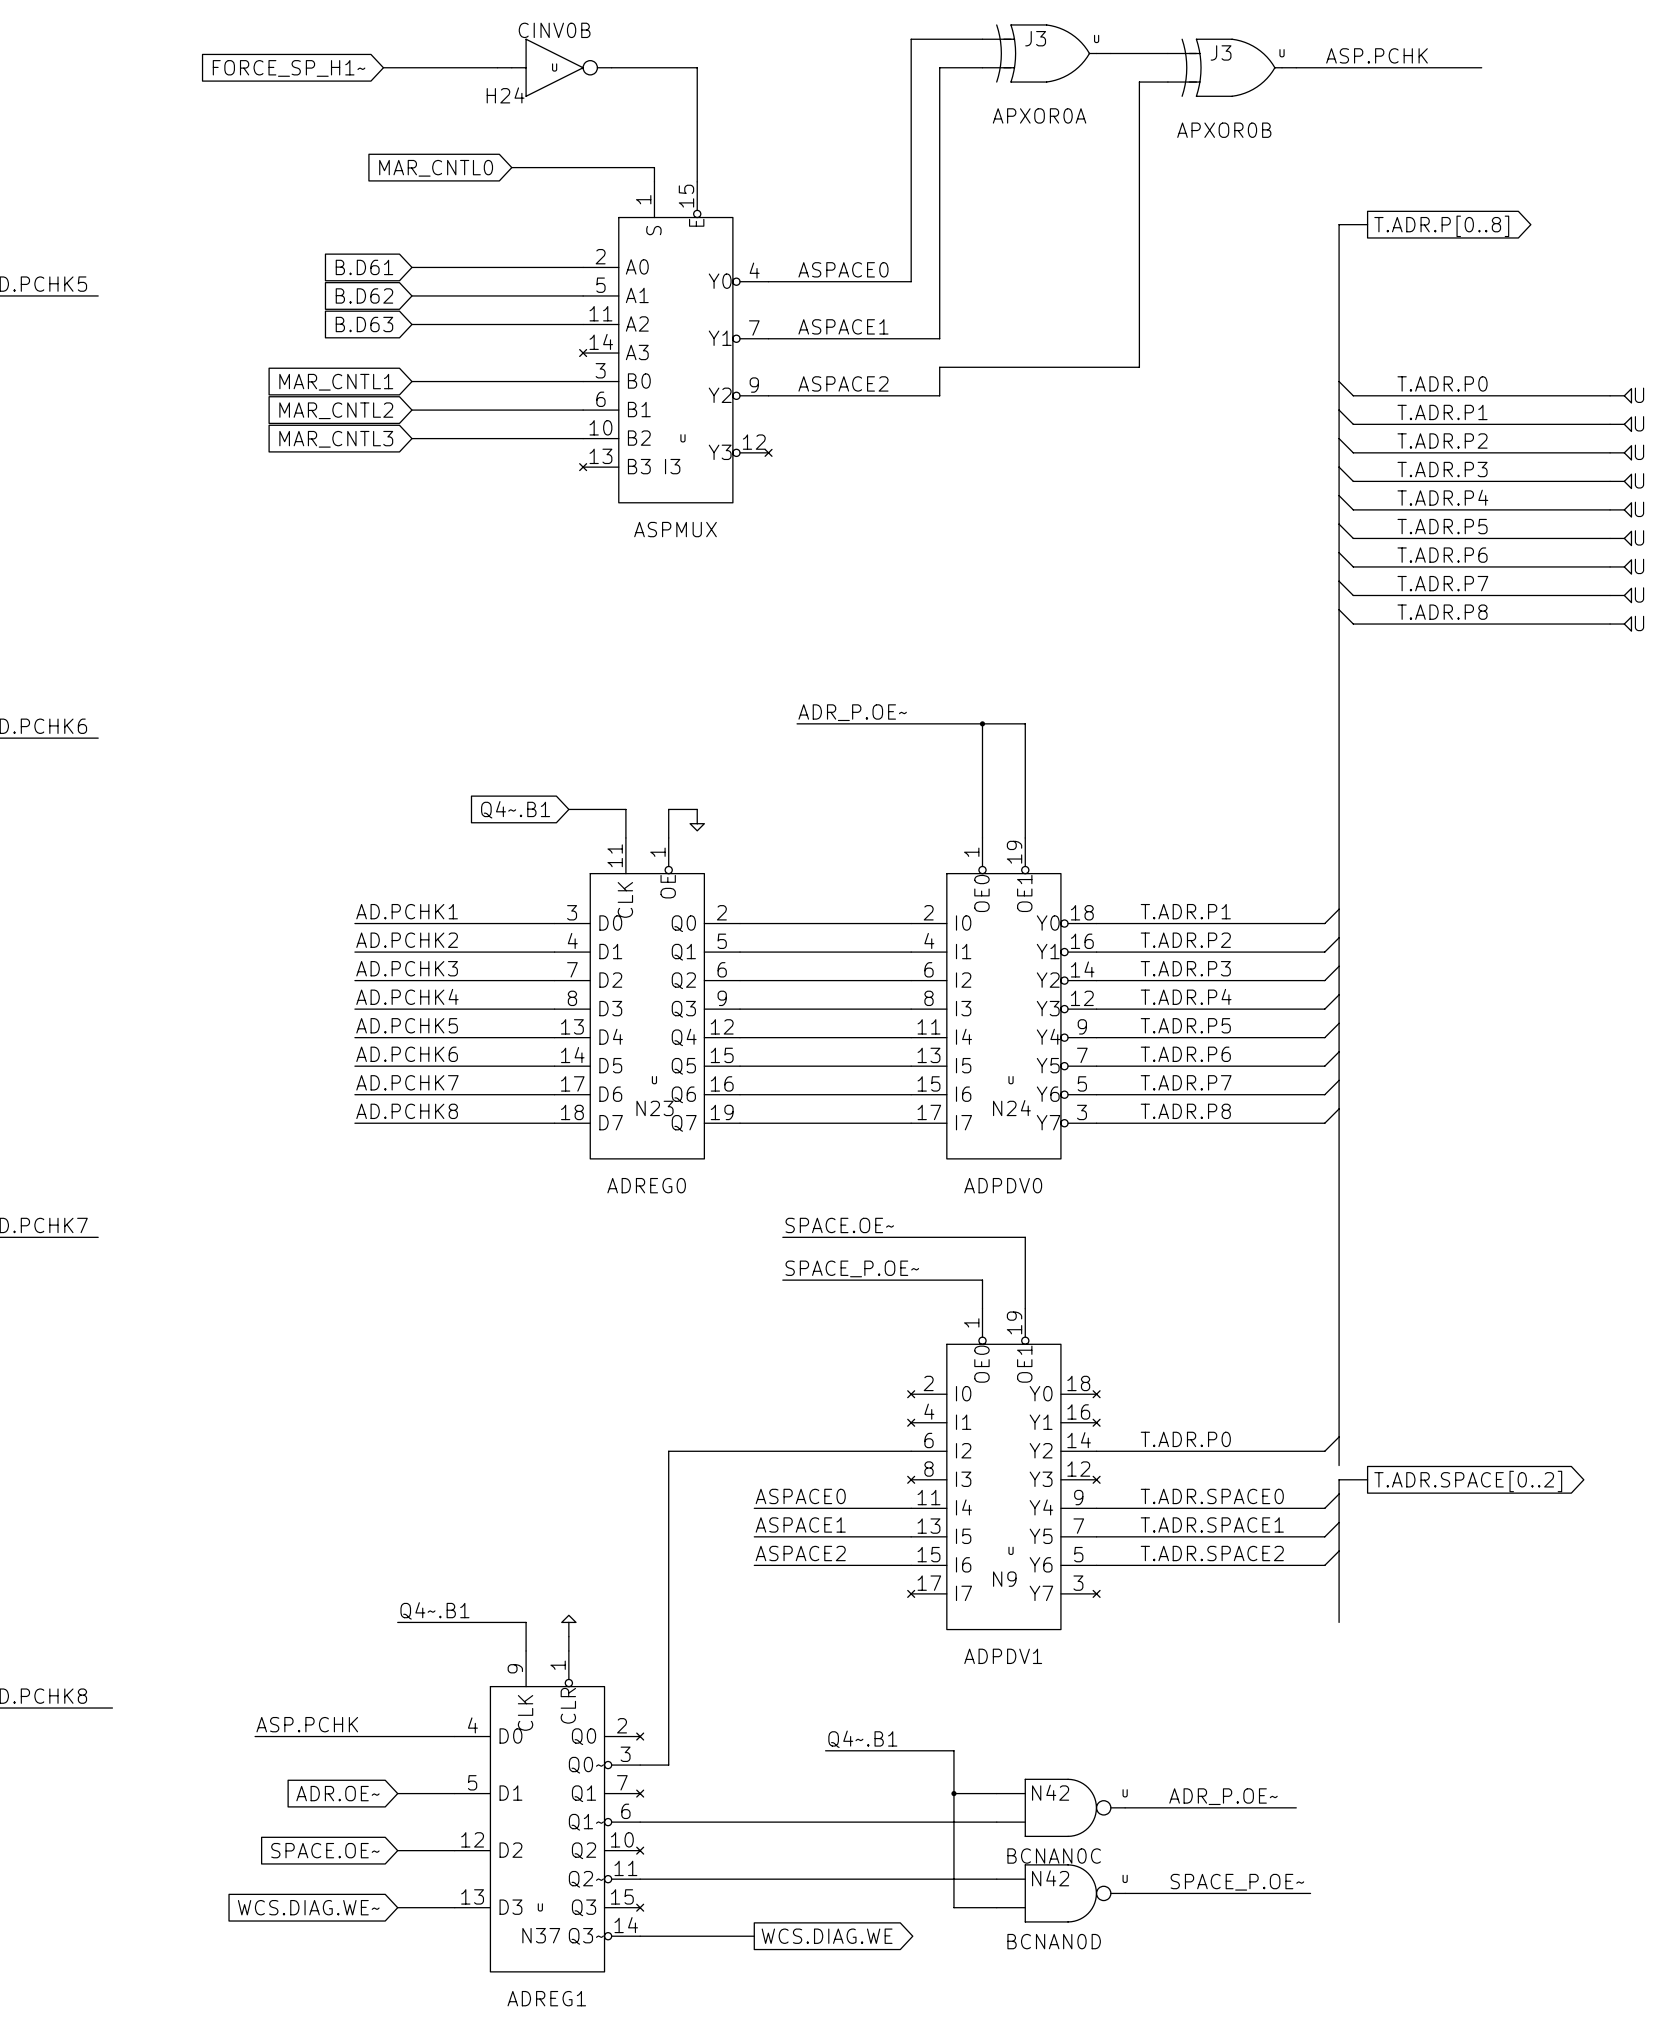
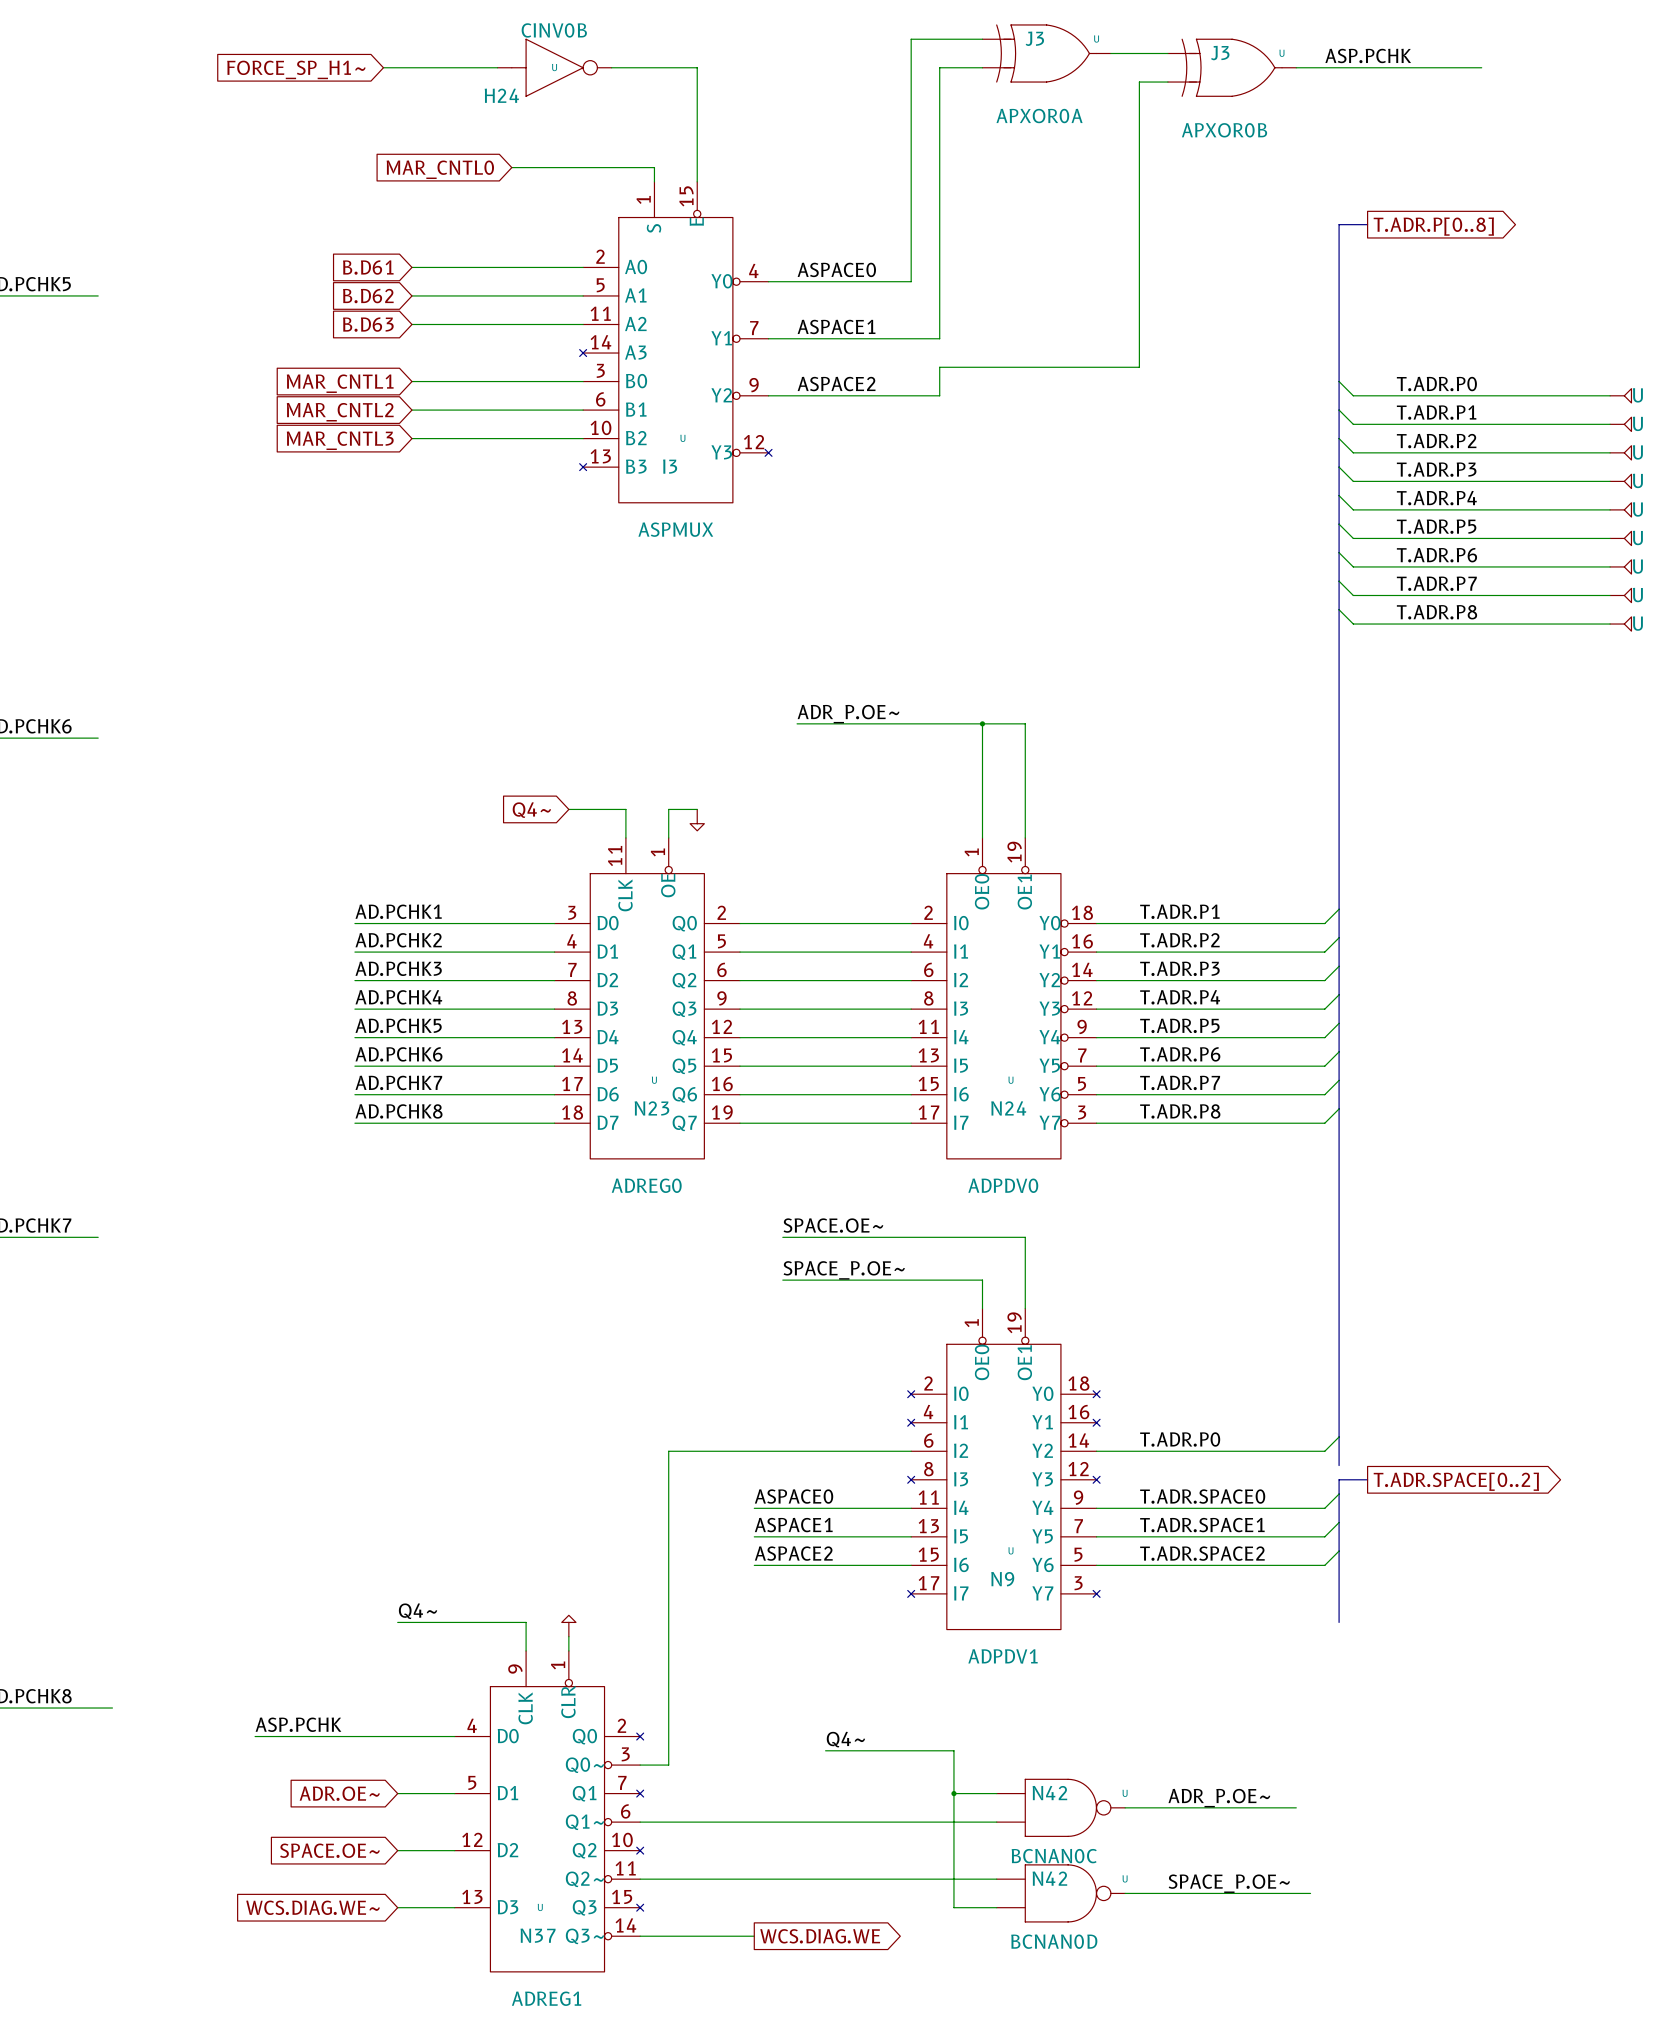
global label: Q4~.B1 (515, 809) -> Q4~ (531, 810)
label: Q4~.B1 (434, 1610) -> Q4~ (418, 1611)
label: Q4~.B1 (862, 1739) -> Q4~ (845, 1739)

